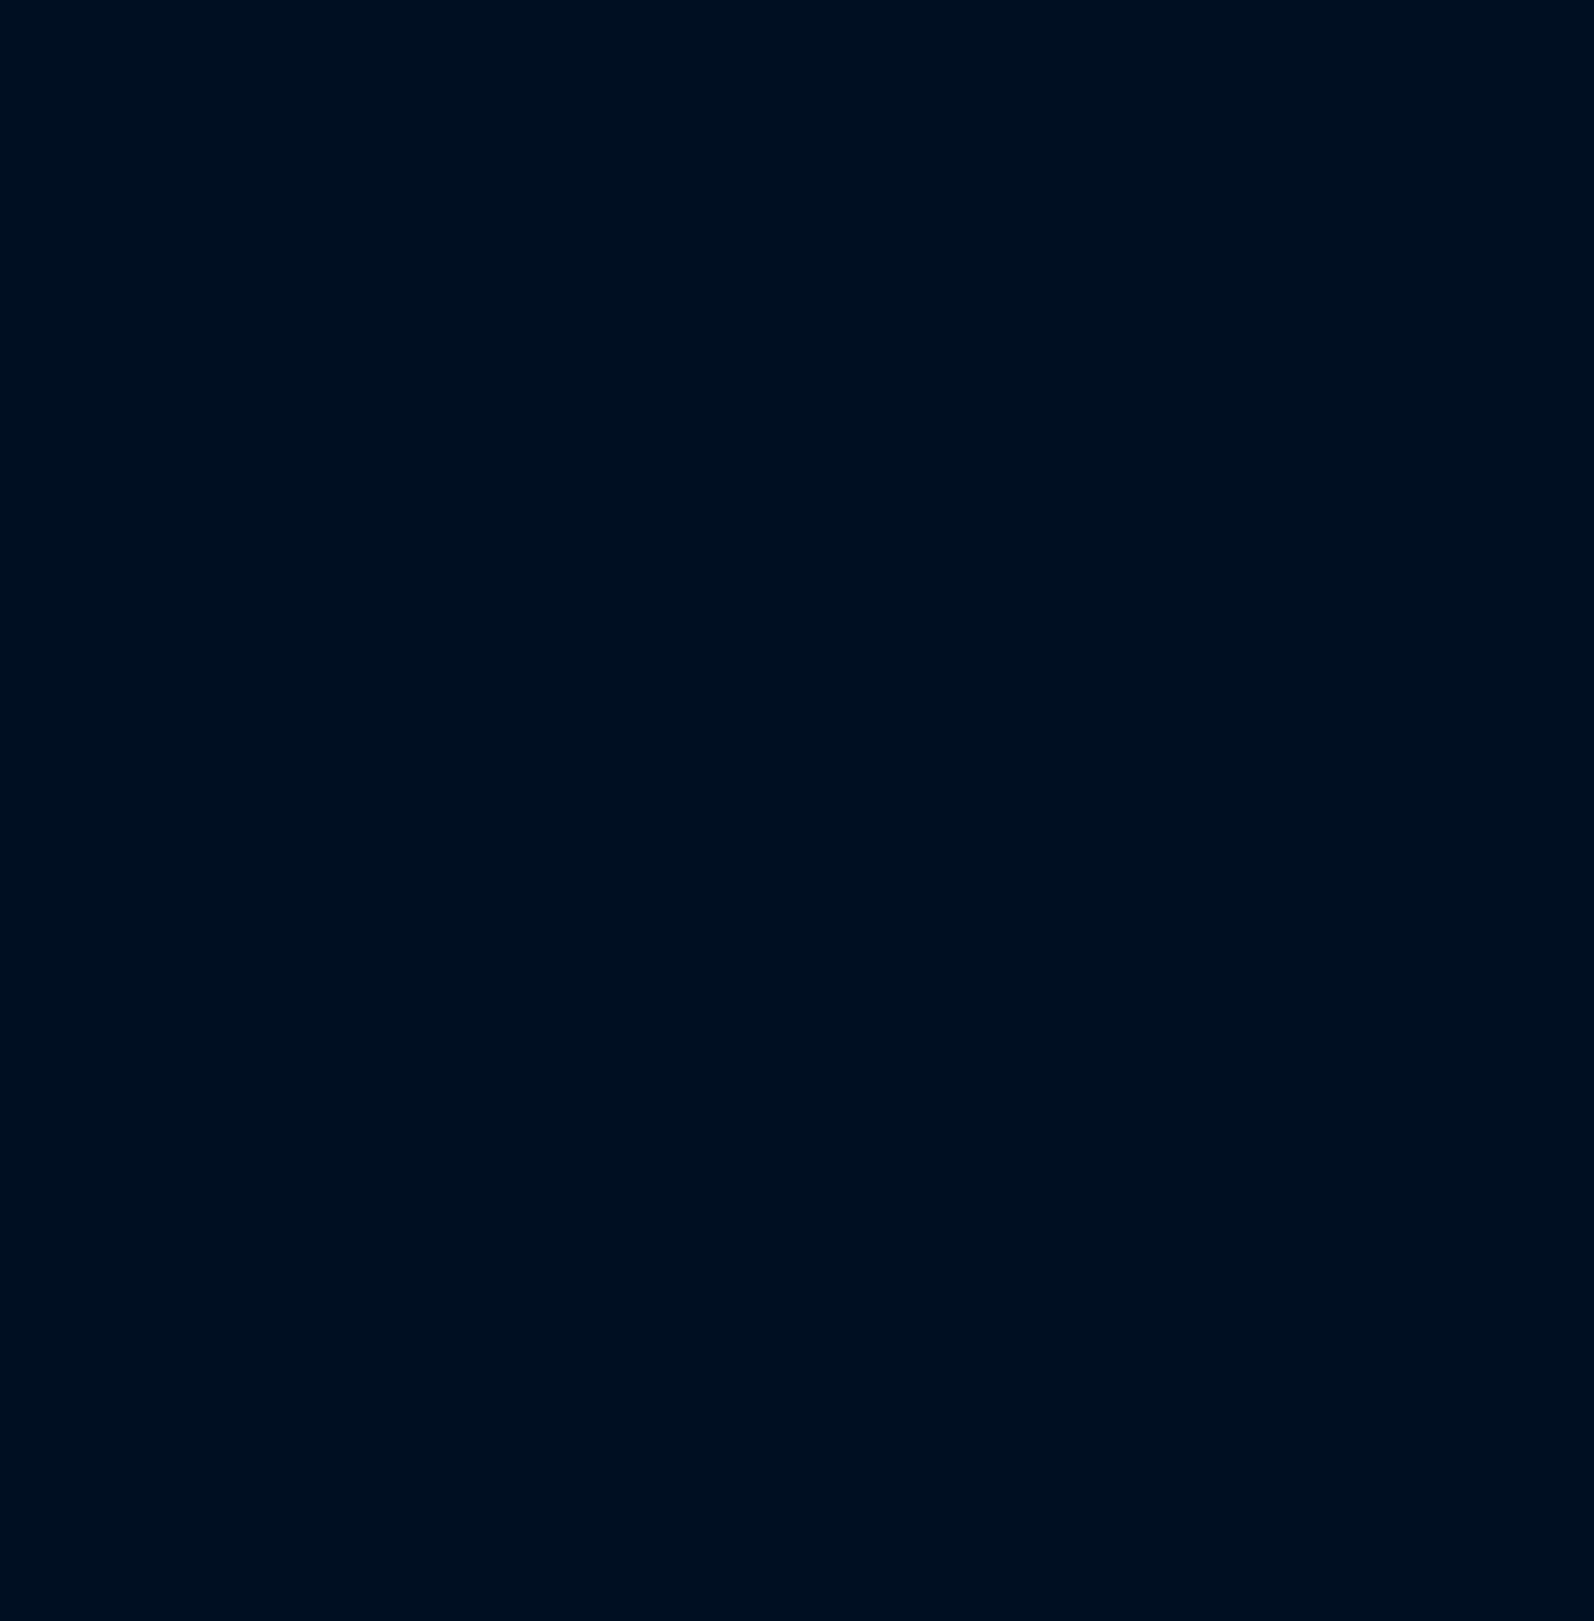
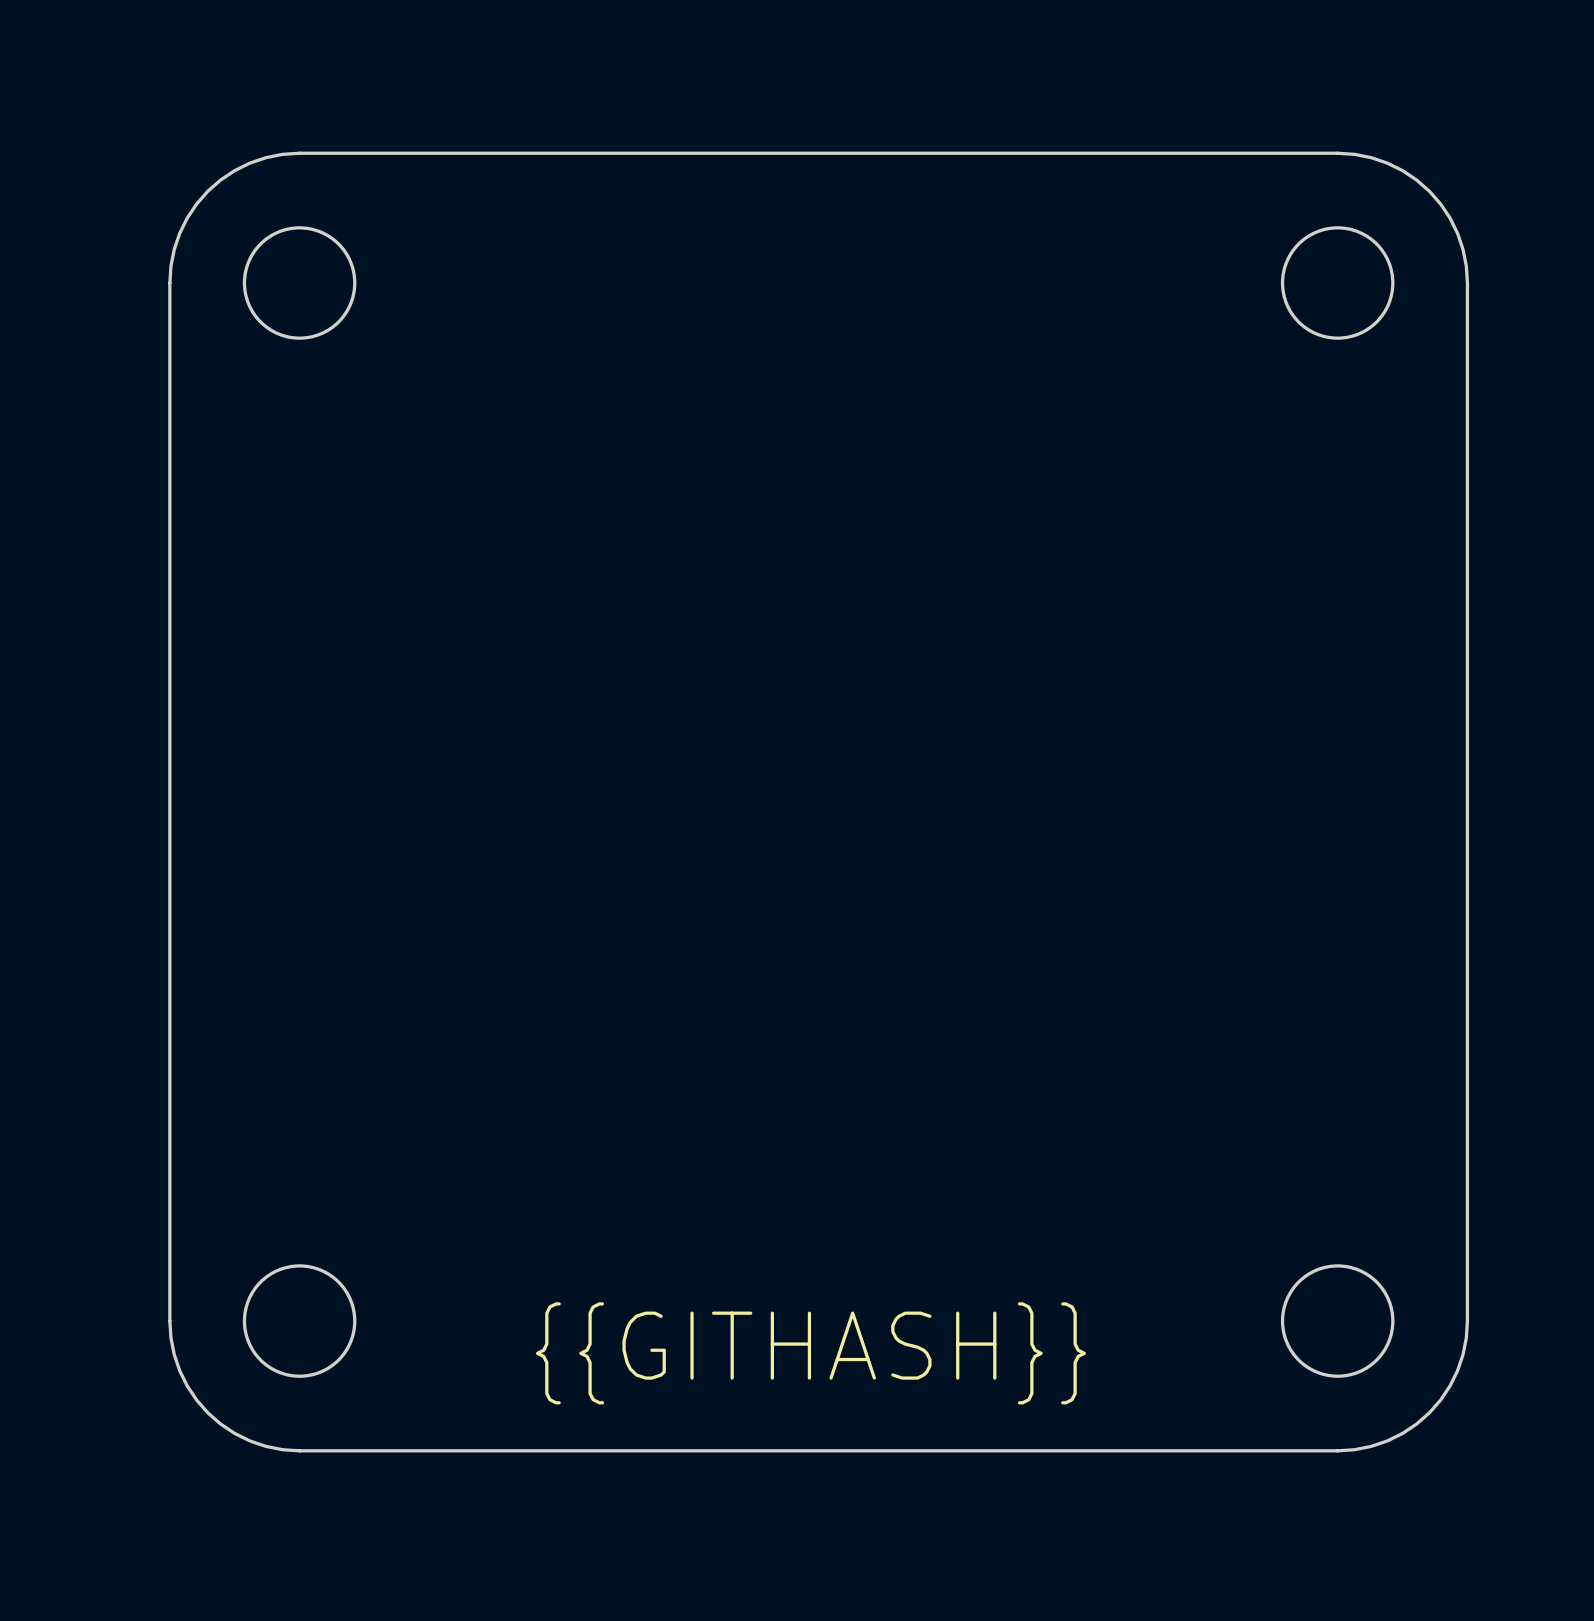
board edge: none -> (299, 153) (1337, 153) (1371, 157) (1387, 163) (1416, 180) (1429, 191) (1440, 204) (1457, 233) (1463, 249) (1467, 283) (1467, 1321) (1466, 1338) (1457, 1370) (1440, 1400) (1429, 1412) (1416, 1424) (1387, 1440) (1371, 1446) (1337, 1450) (299, 1450) (282, 1449) (249, 1440) (220, 1424) (207, 1412) (187, 1385) (179, 1370) (170, 1338) (169, 1321) (170, 266) (179, 233) (187, 218) (207, 191) (220, 180) (249, 163) (266, 157) (299, 153)
round board edge: none -> [242, 226, 357, 340]
round board edge: none -> [1280, 226, 1395, 340]
round board edge: none -> [242, 1264, 357, 1378]
round board edge: none -> [1280, 1264, 1395, 1378]
text: none -> {{GITHASH}} (810, 1353)

